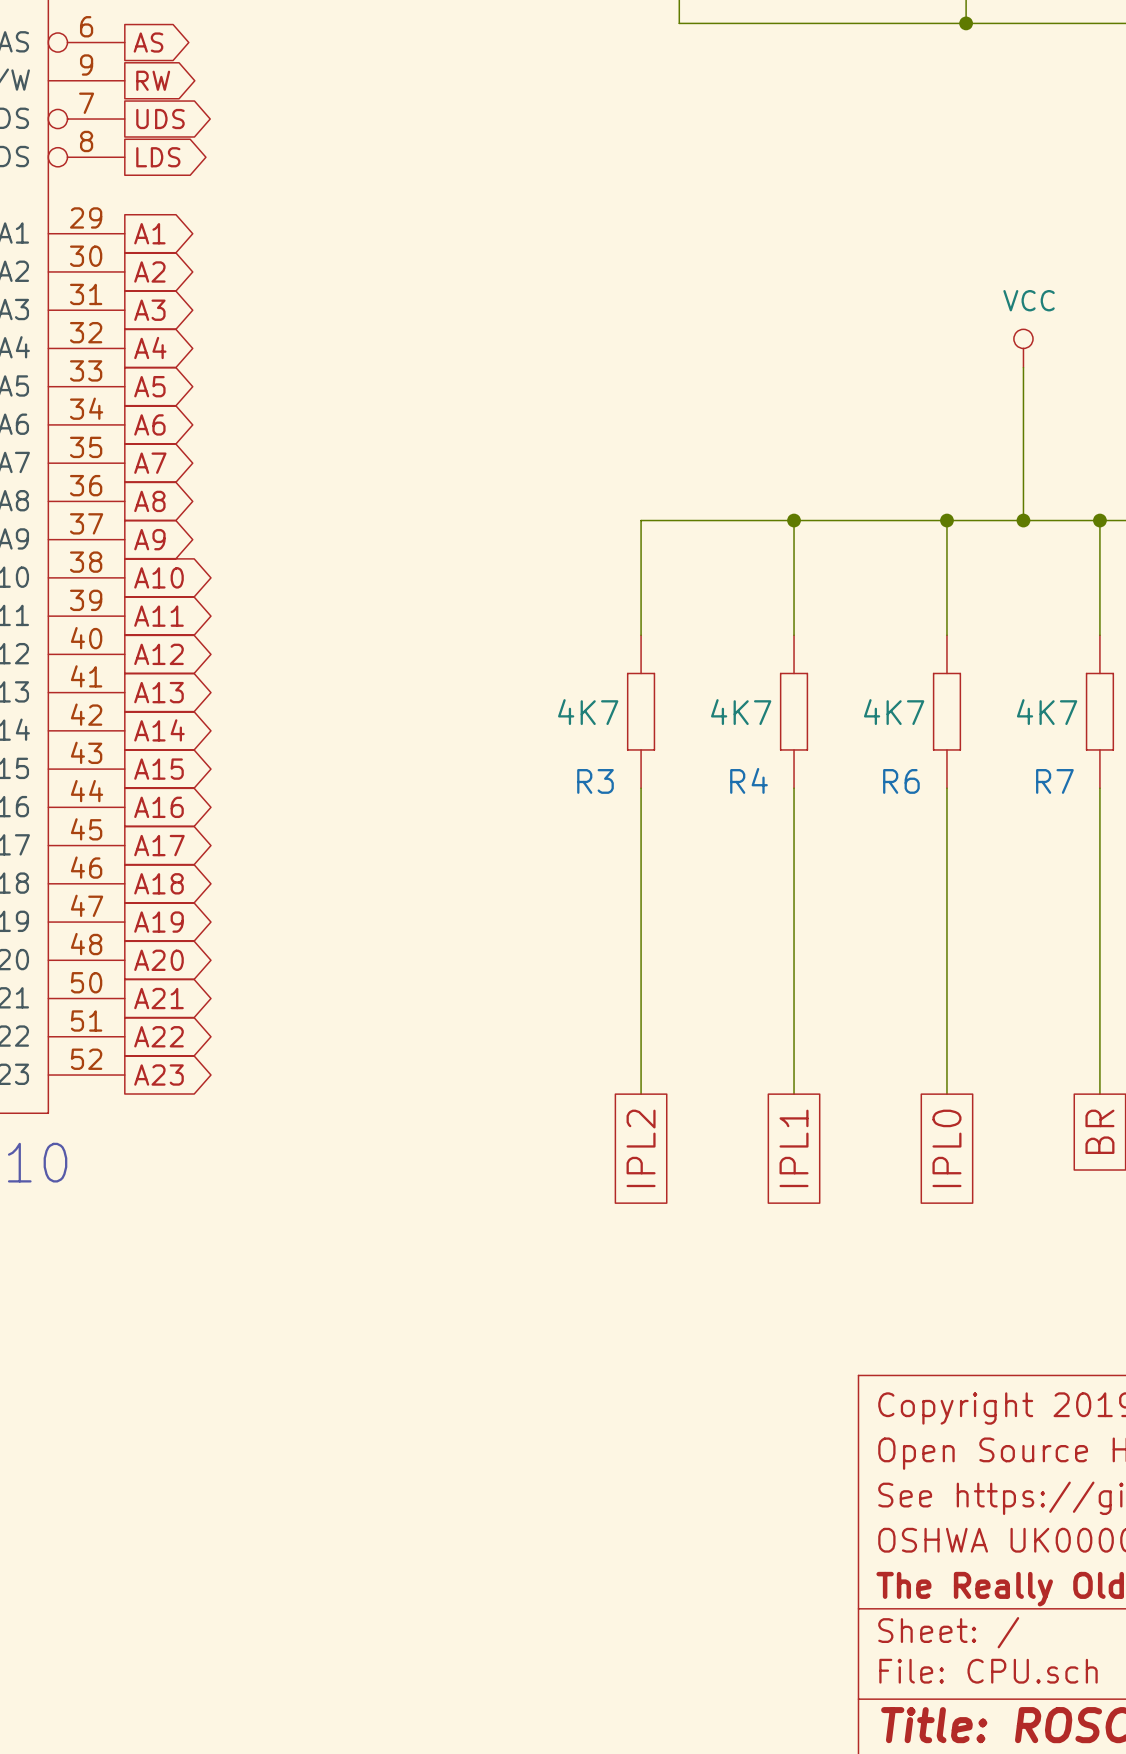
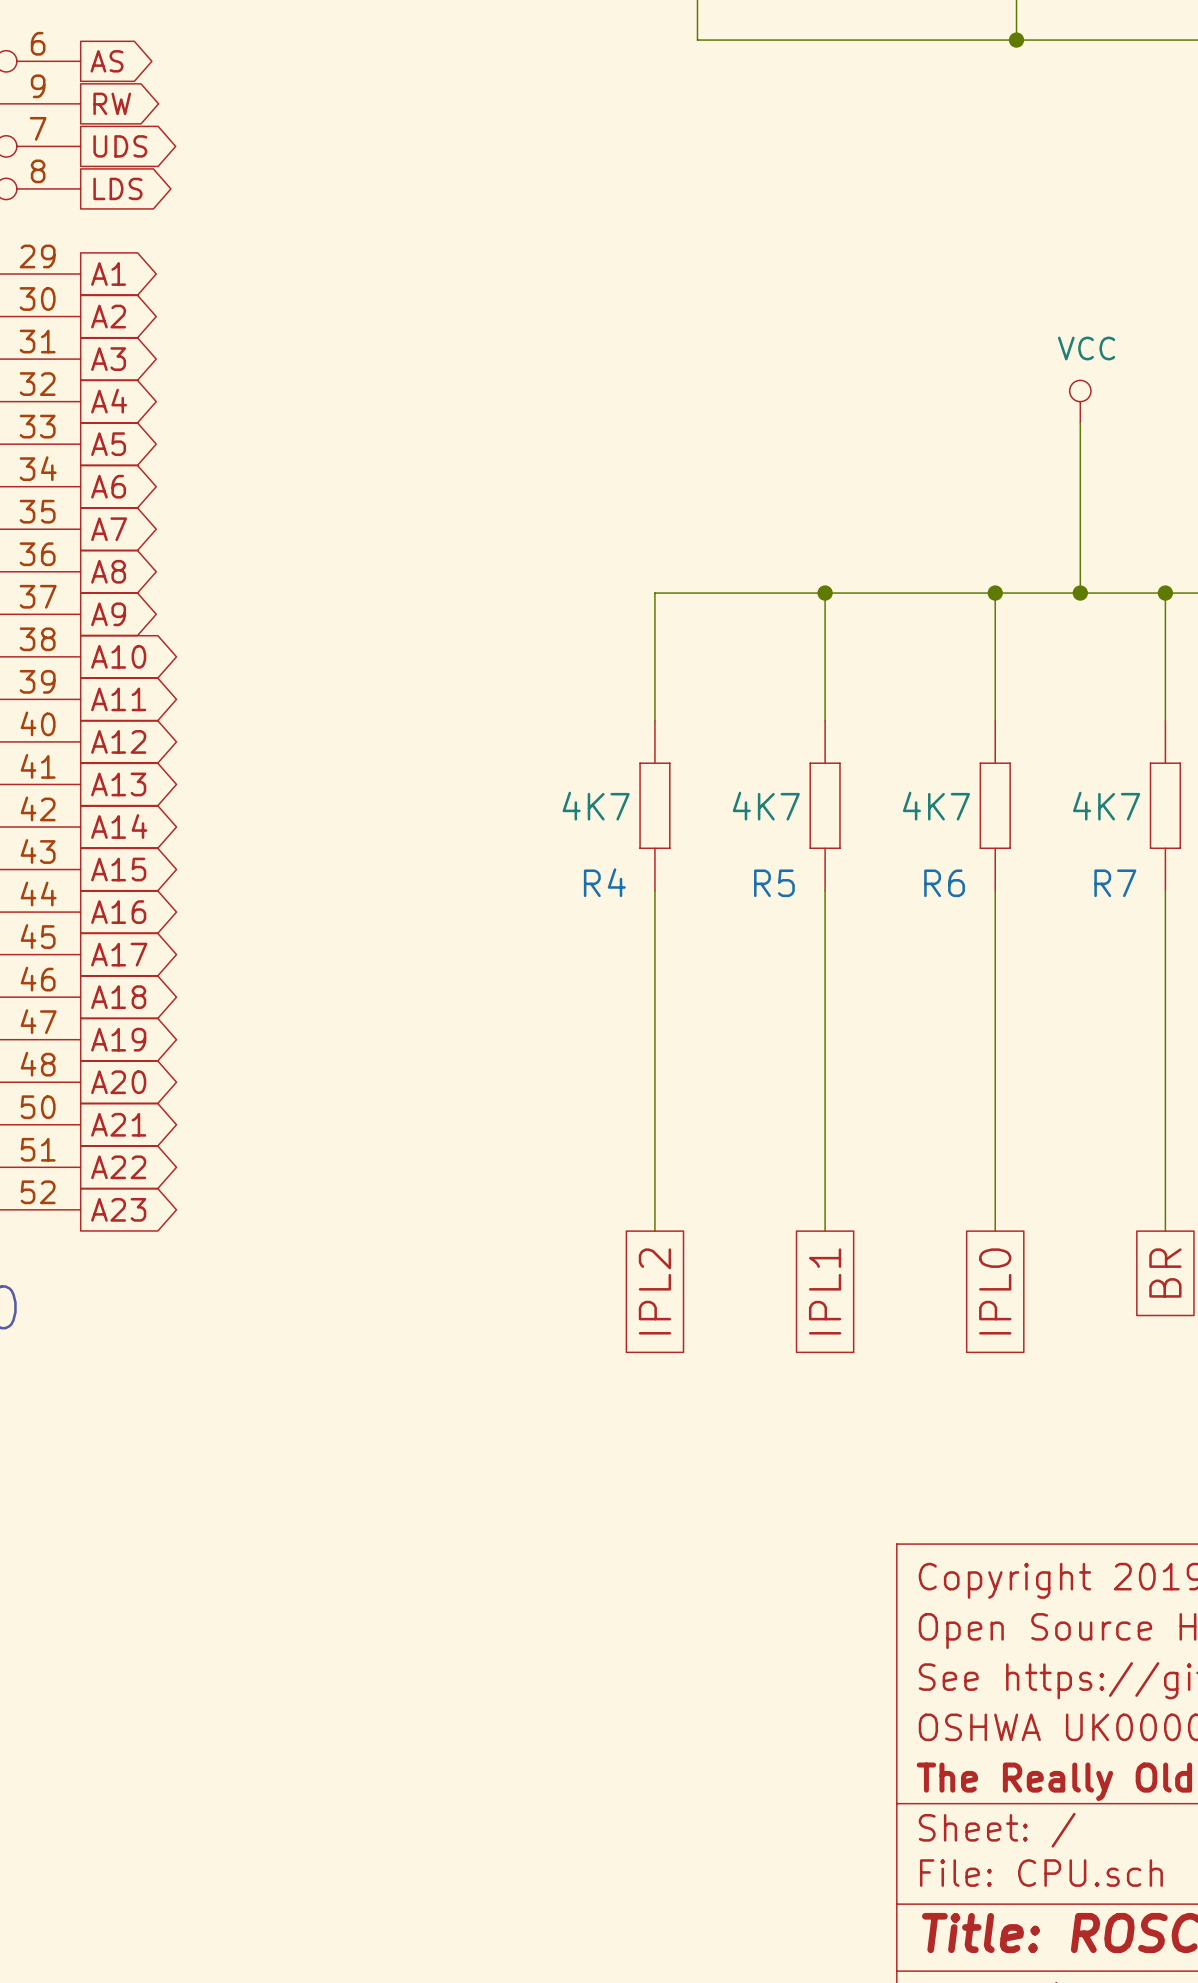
R4 name: R4 (749, 780) -> R5 (774, 883)
R3 name: R3 (595, 781) -> R4 (604, 882)

